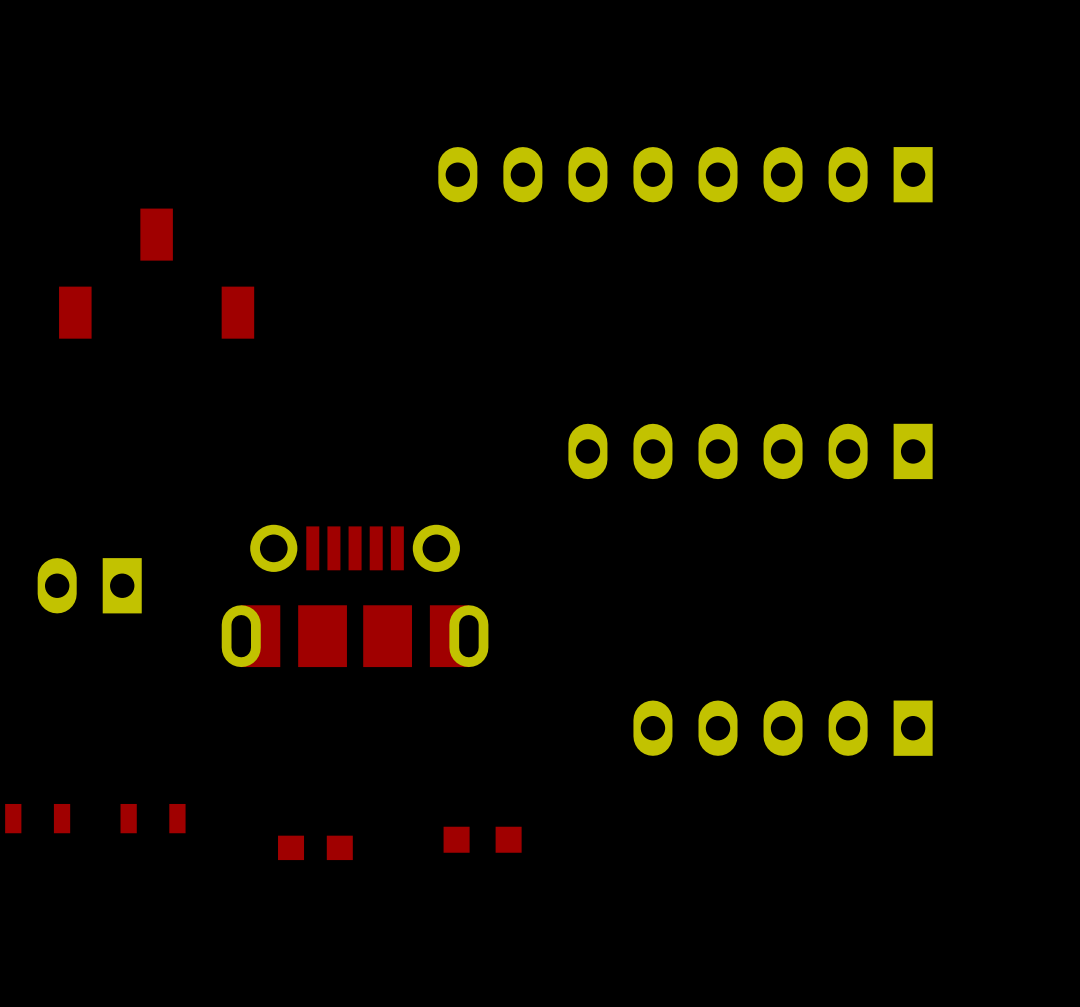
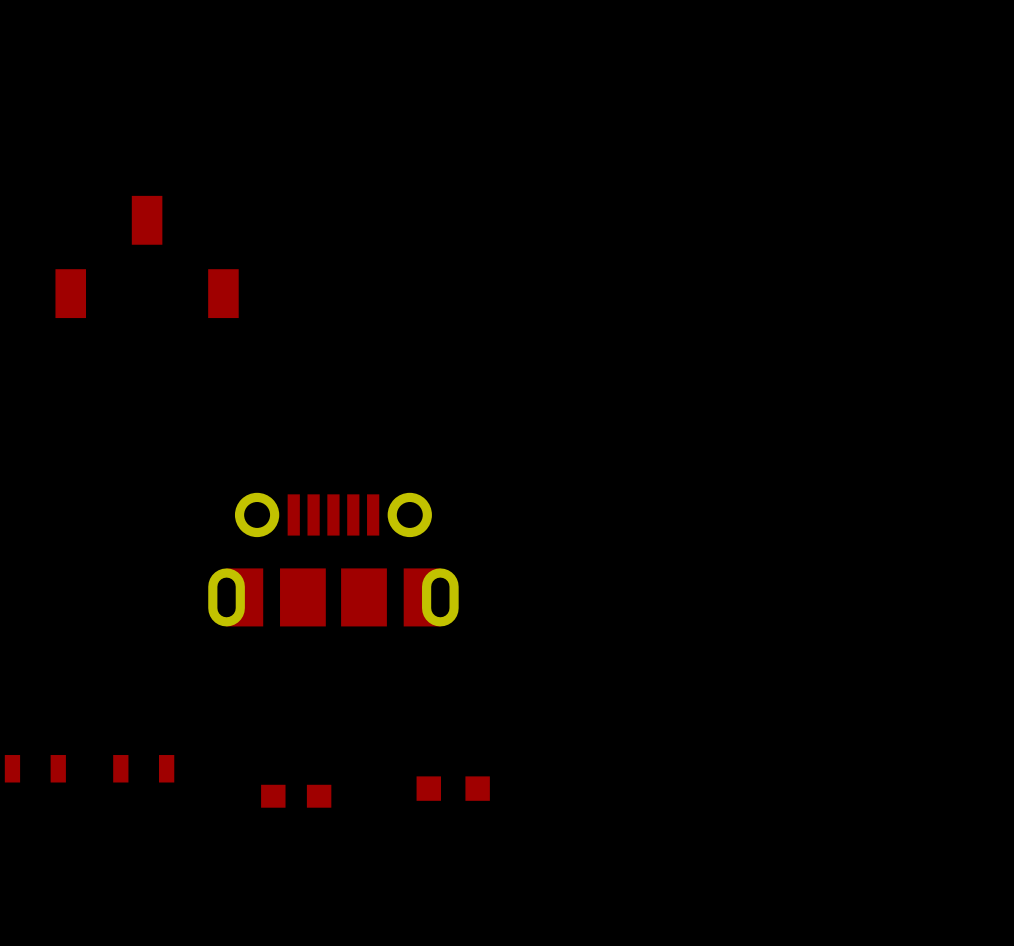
part: (685, 174) -> none
part: (750, 451) -> none
part: (89, 585) -> none
part: (783, 728) -> none

